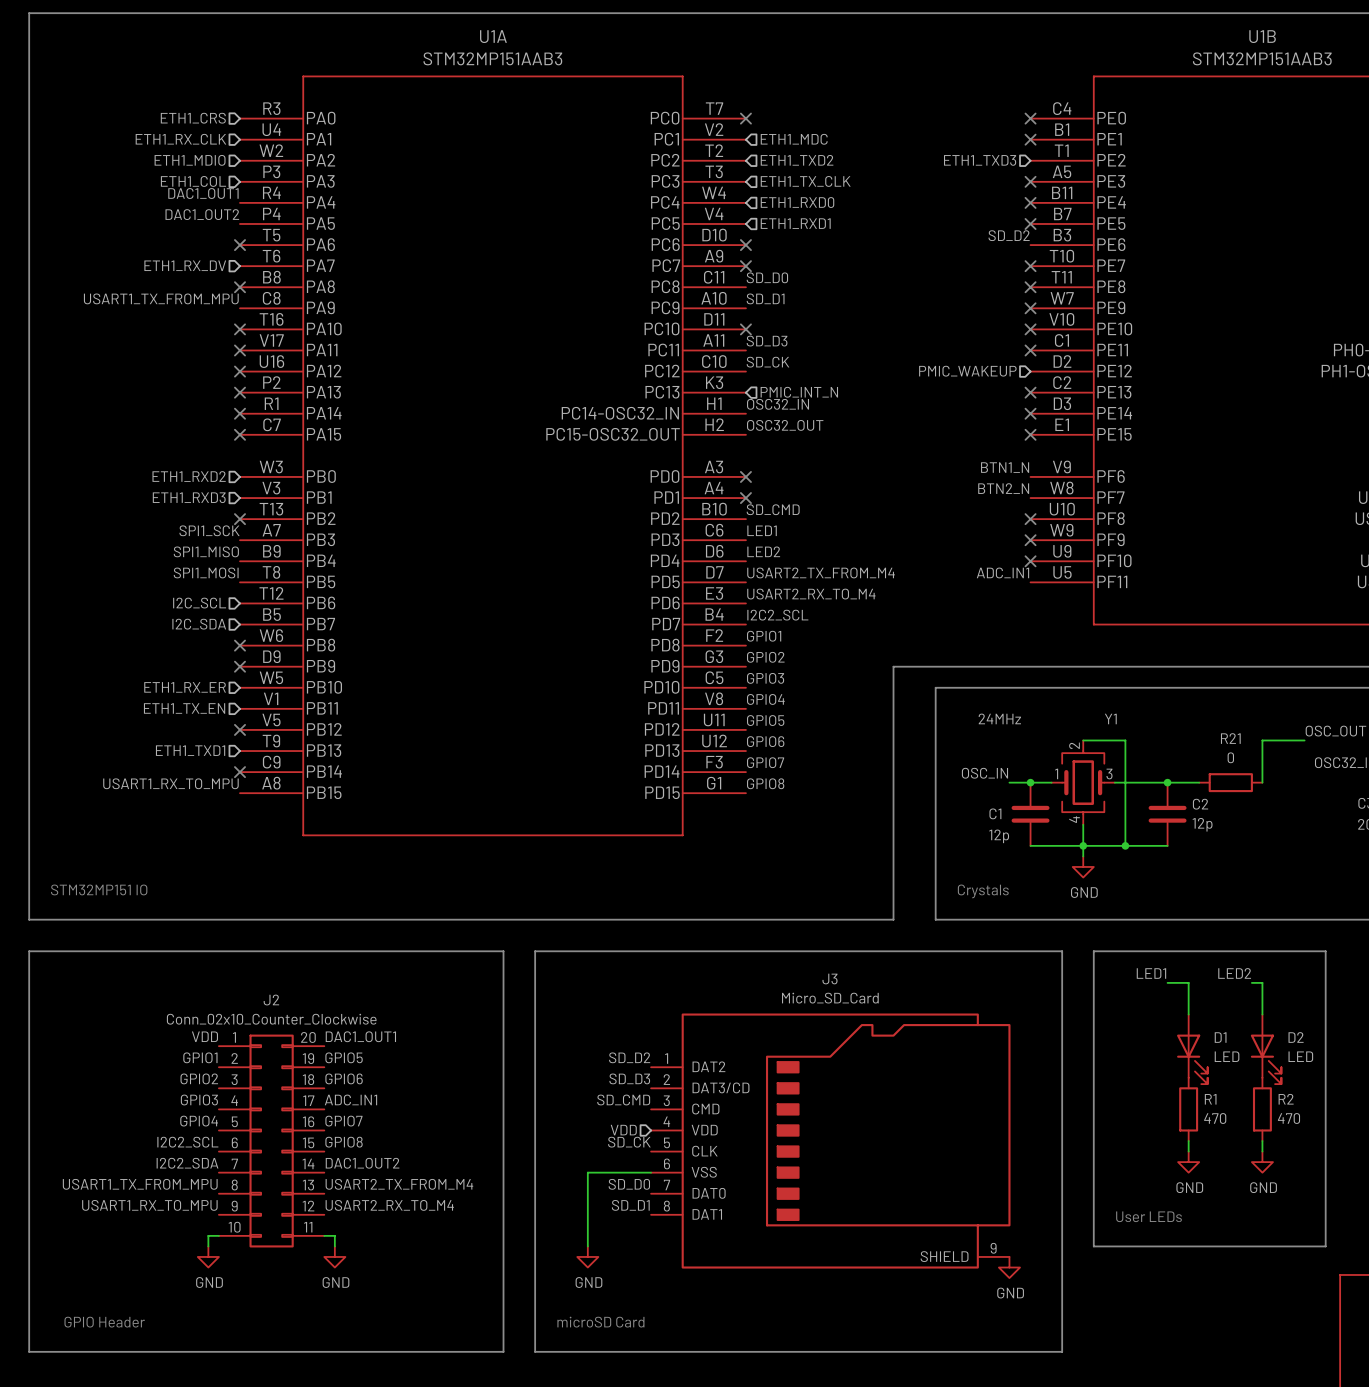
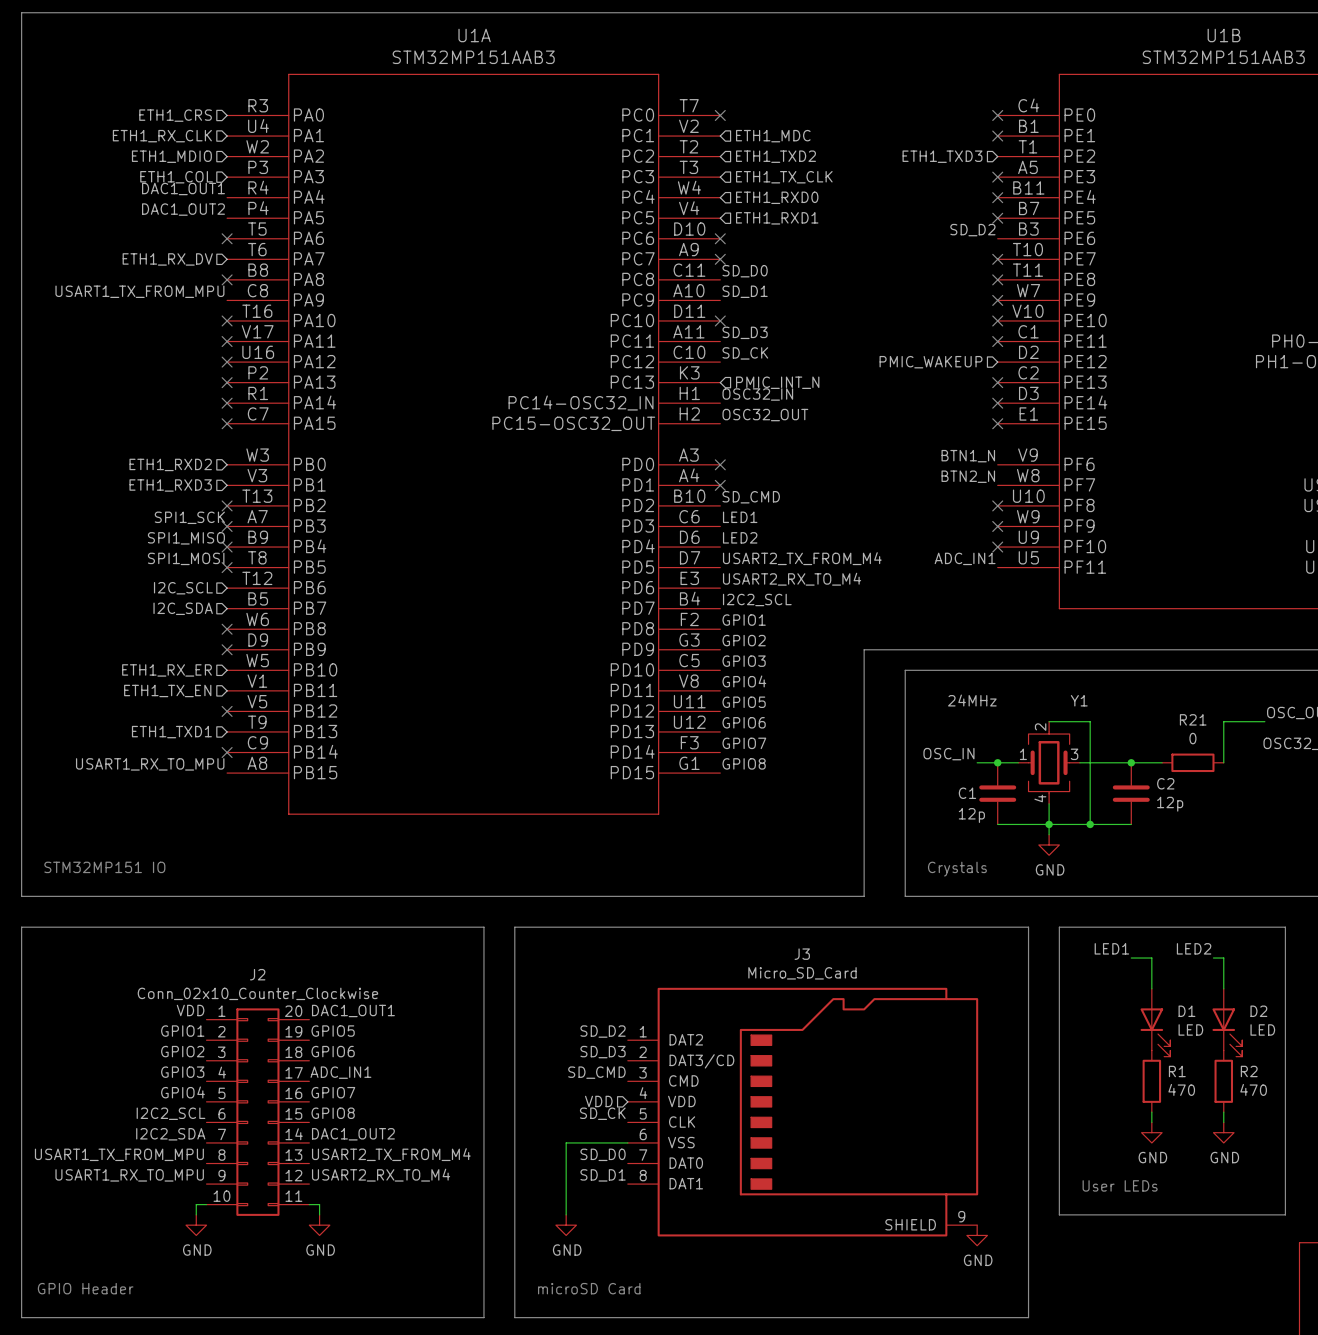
no-connect mark: none -> (227, 526)
no-connect mark: none -> (227, 547)
no-connect mark: none -> (227, 567)

